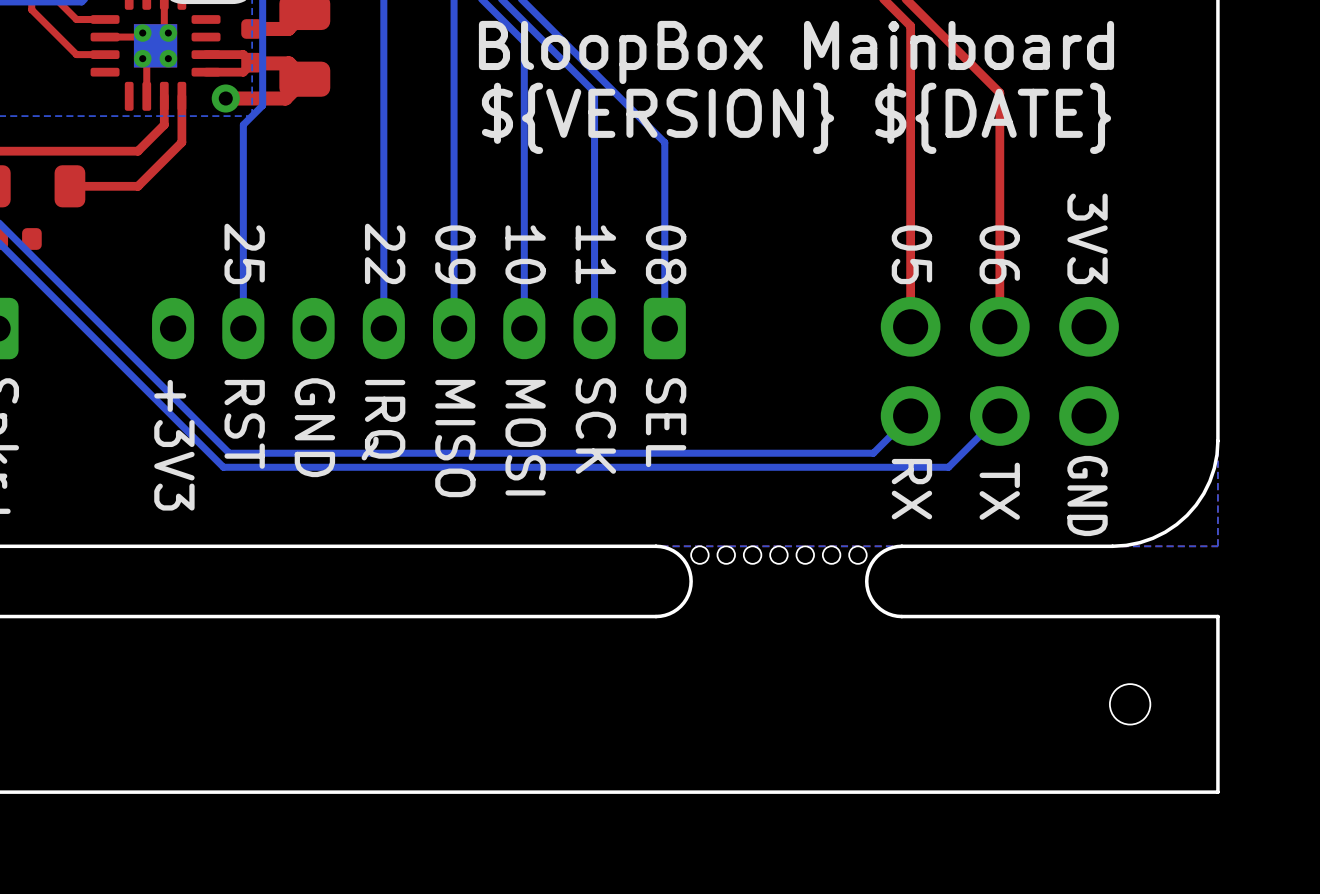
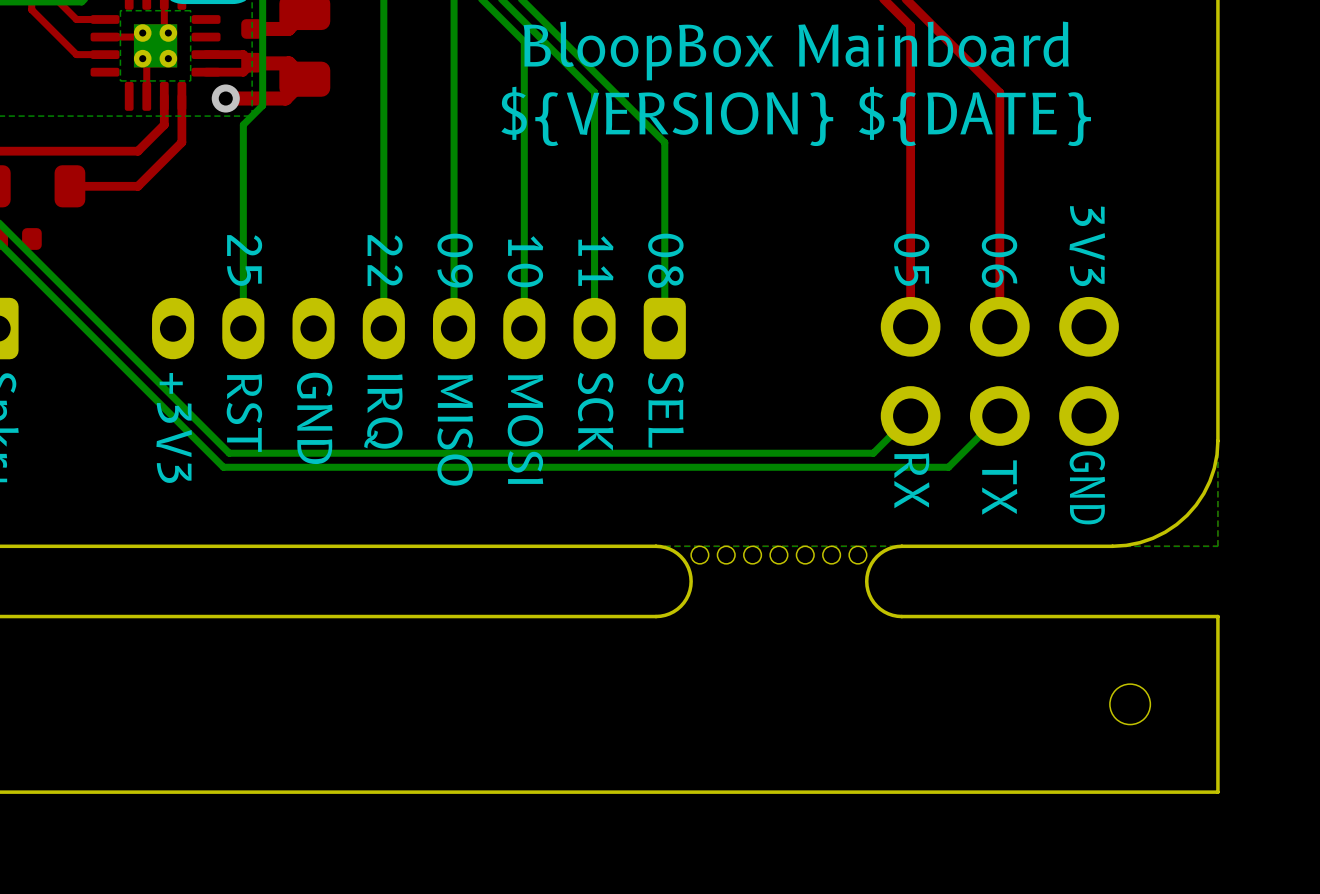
bottom zone outline: none -> (190, 10) (190, 80) (120, 80) (120, 10) (190, 10)

